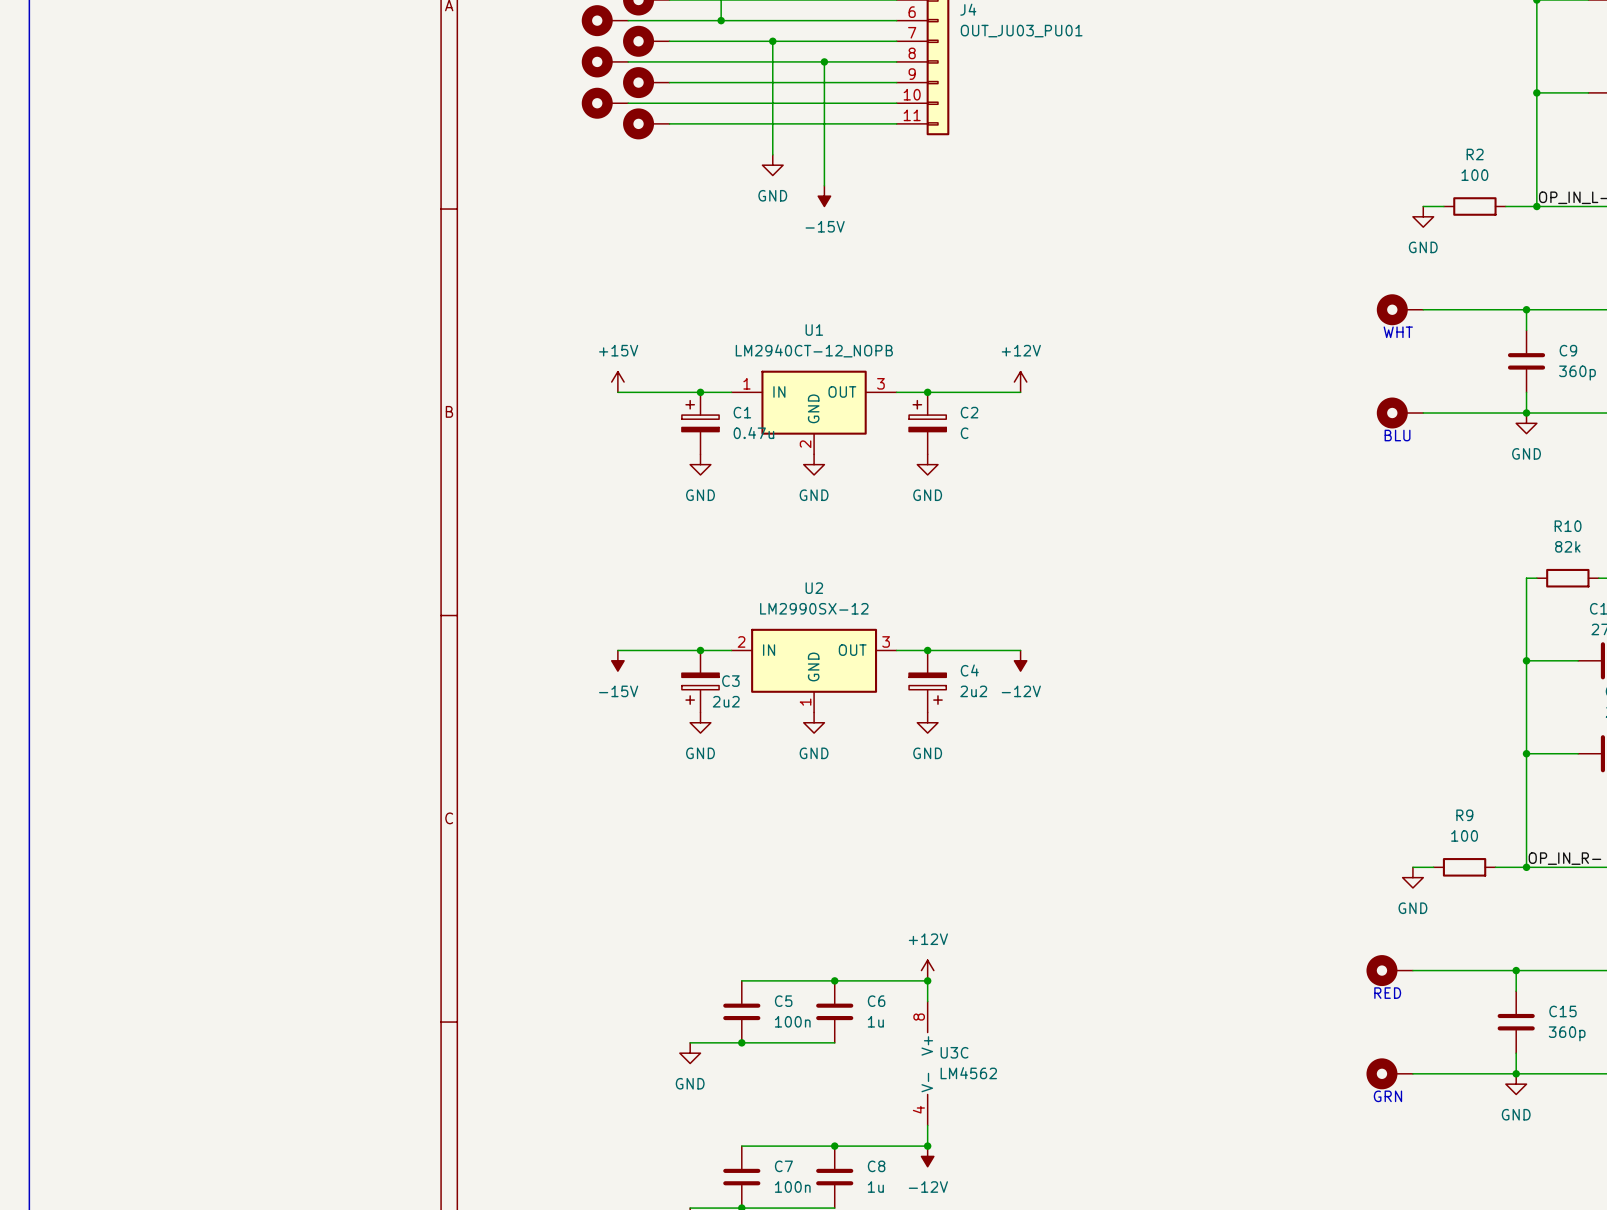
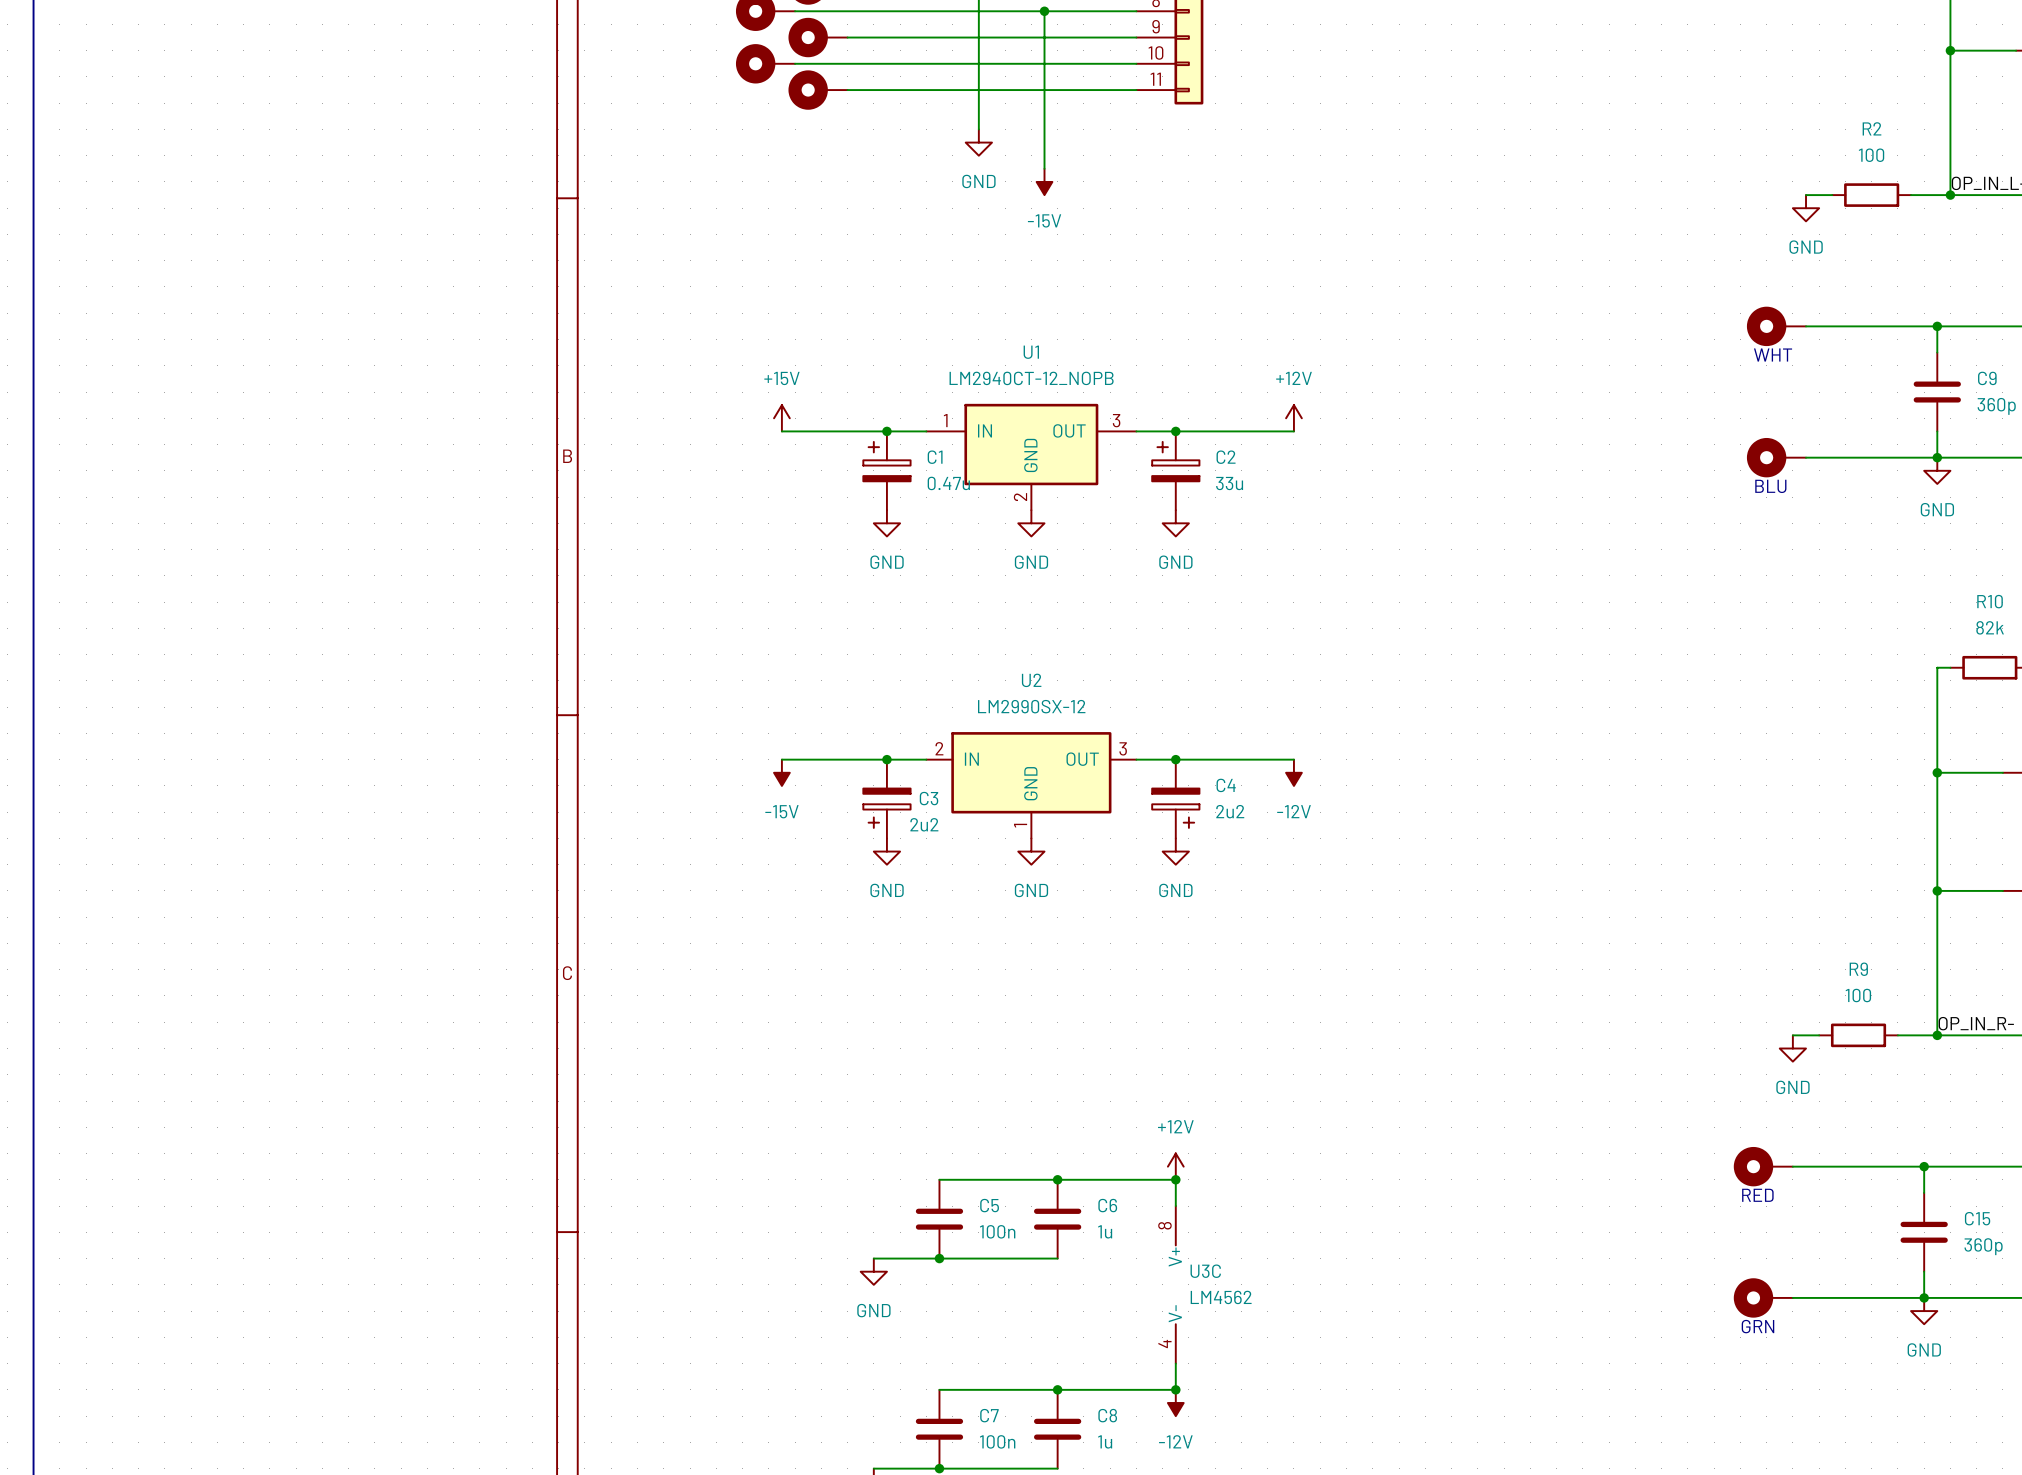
C2 value: C (964, 433) -> 33u (1229, 483)

